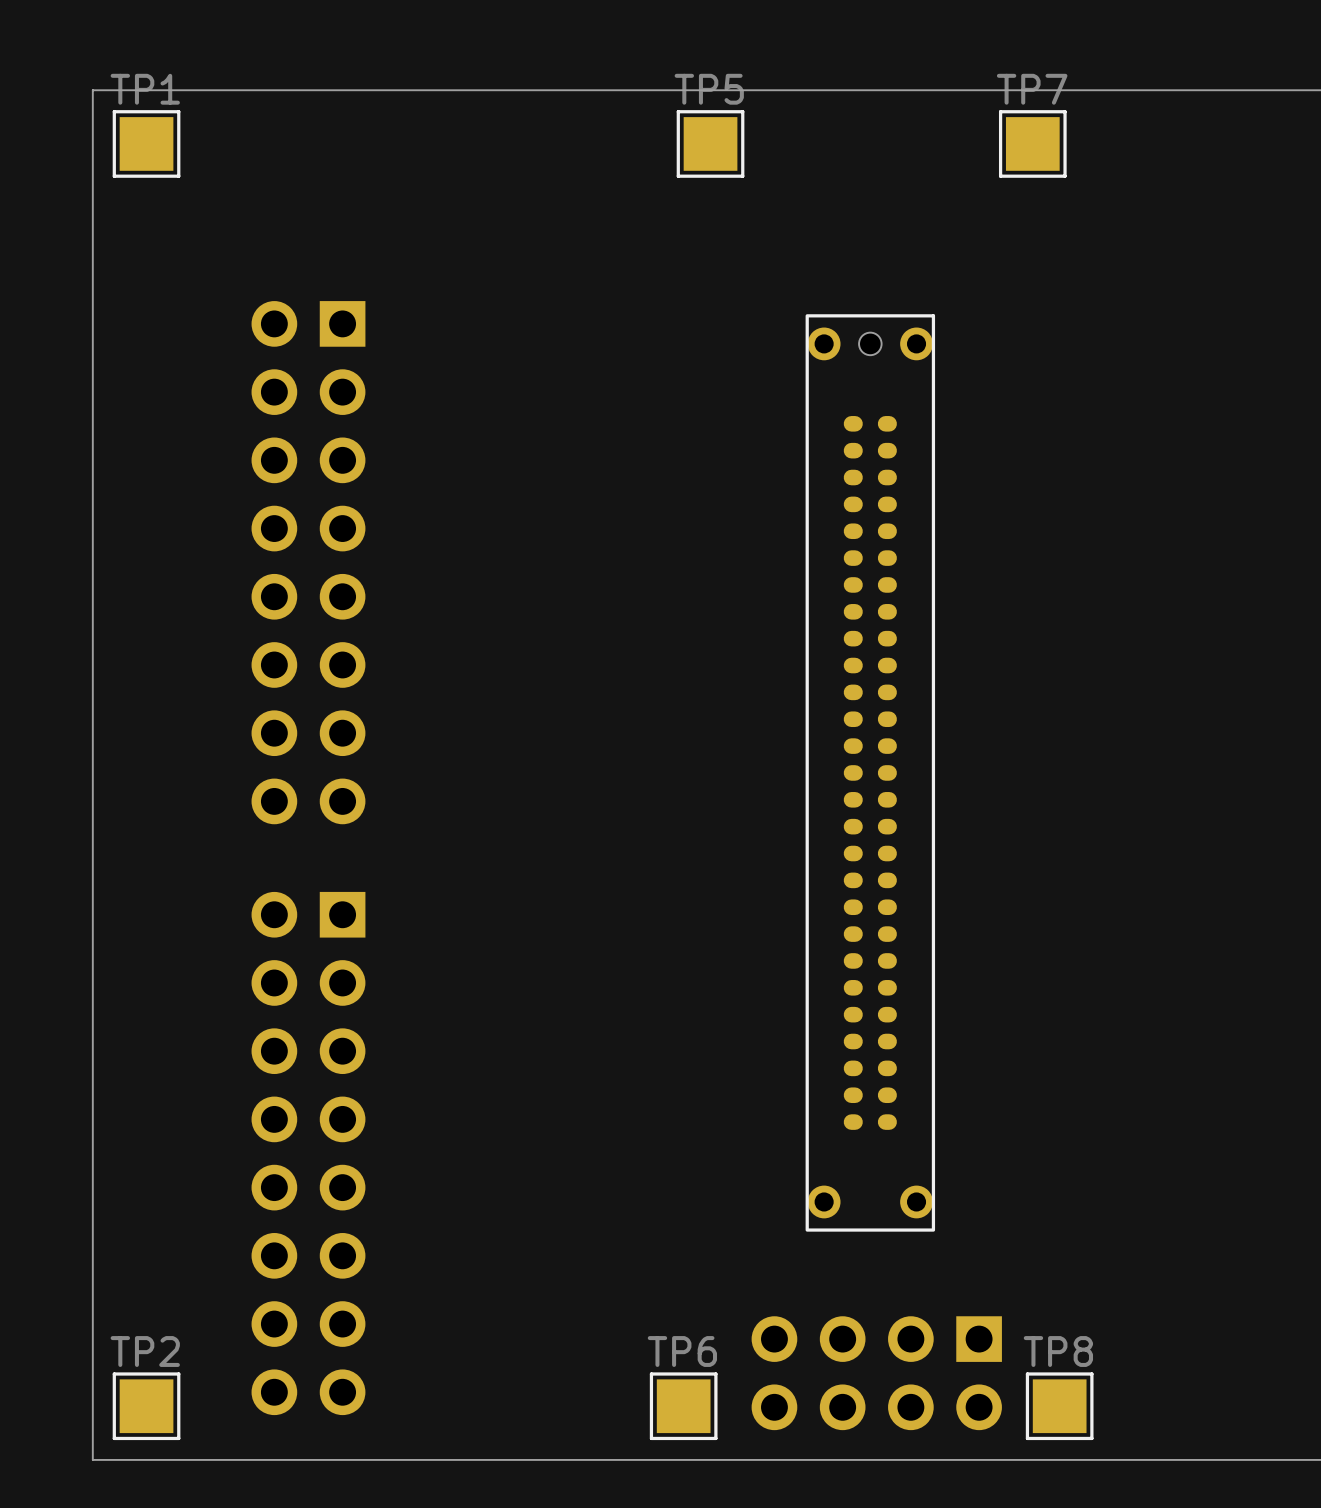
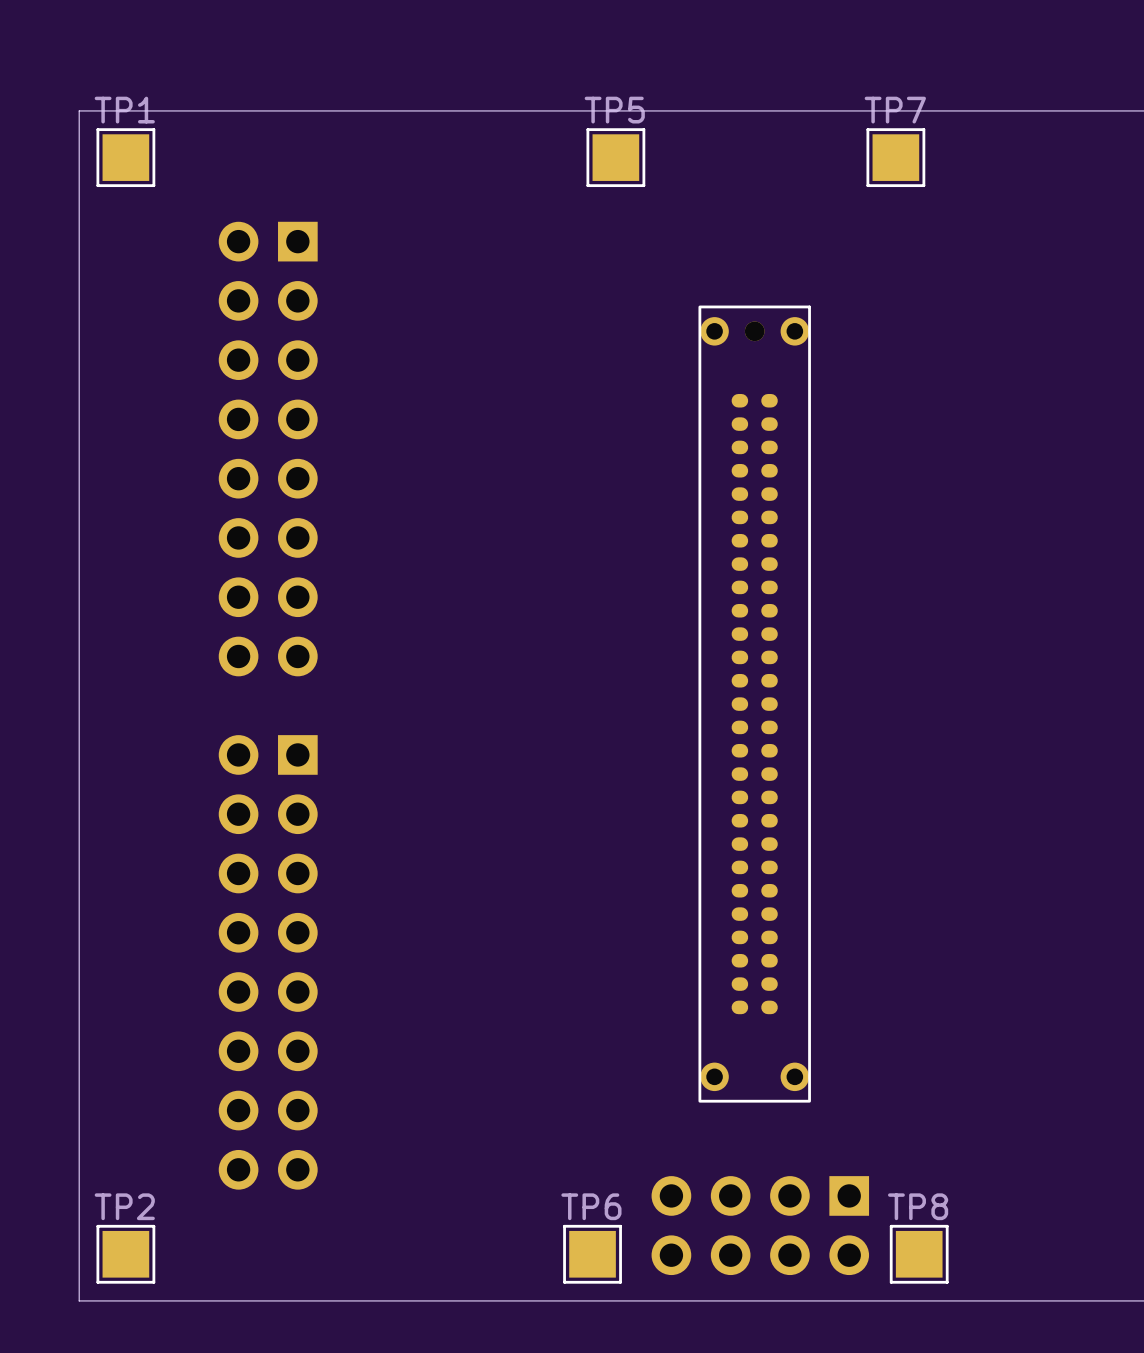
part footprint: [805, 314, 936, 1232] -> [698, 305, 811, 1103]
part position: (308, 562) -> (268, 449)
part position: (308, 1153) -> (268, 962)

